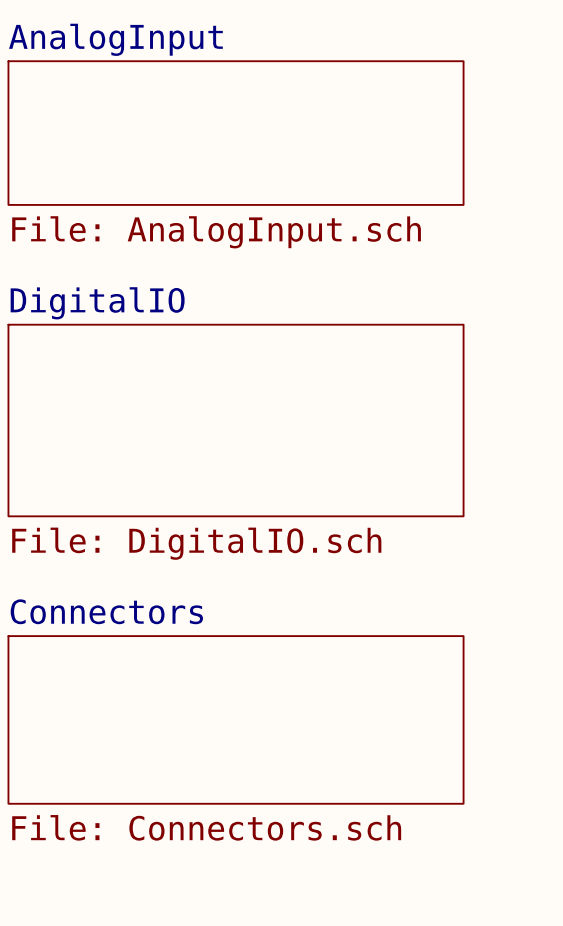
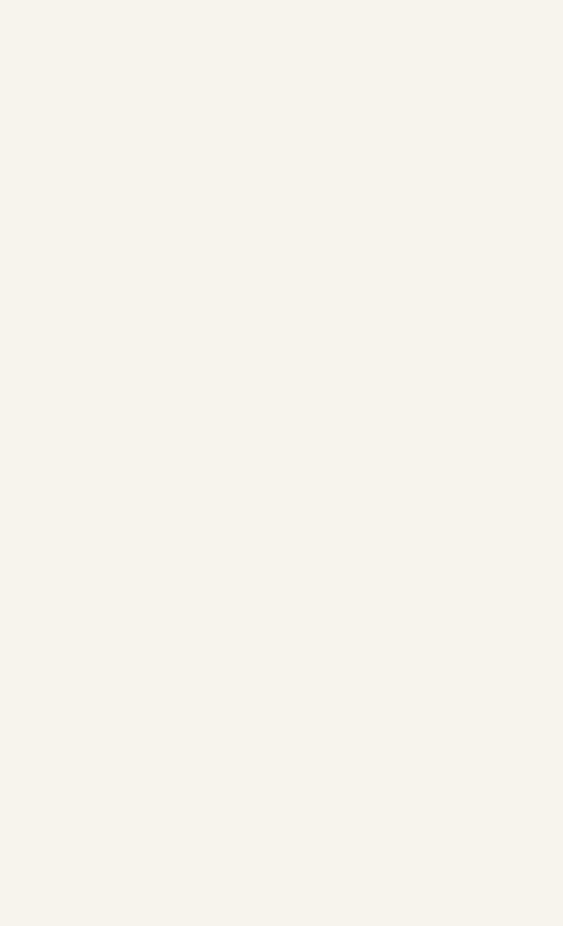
sheet AnalogInput: File: AnalogInput.sch (236, 133) -> none
sheet DigitalIO: File: DigitalIO.sch (236, 420) -> none
sheet Connectors: File: Connectors.sch (236, 719) -> none

